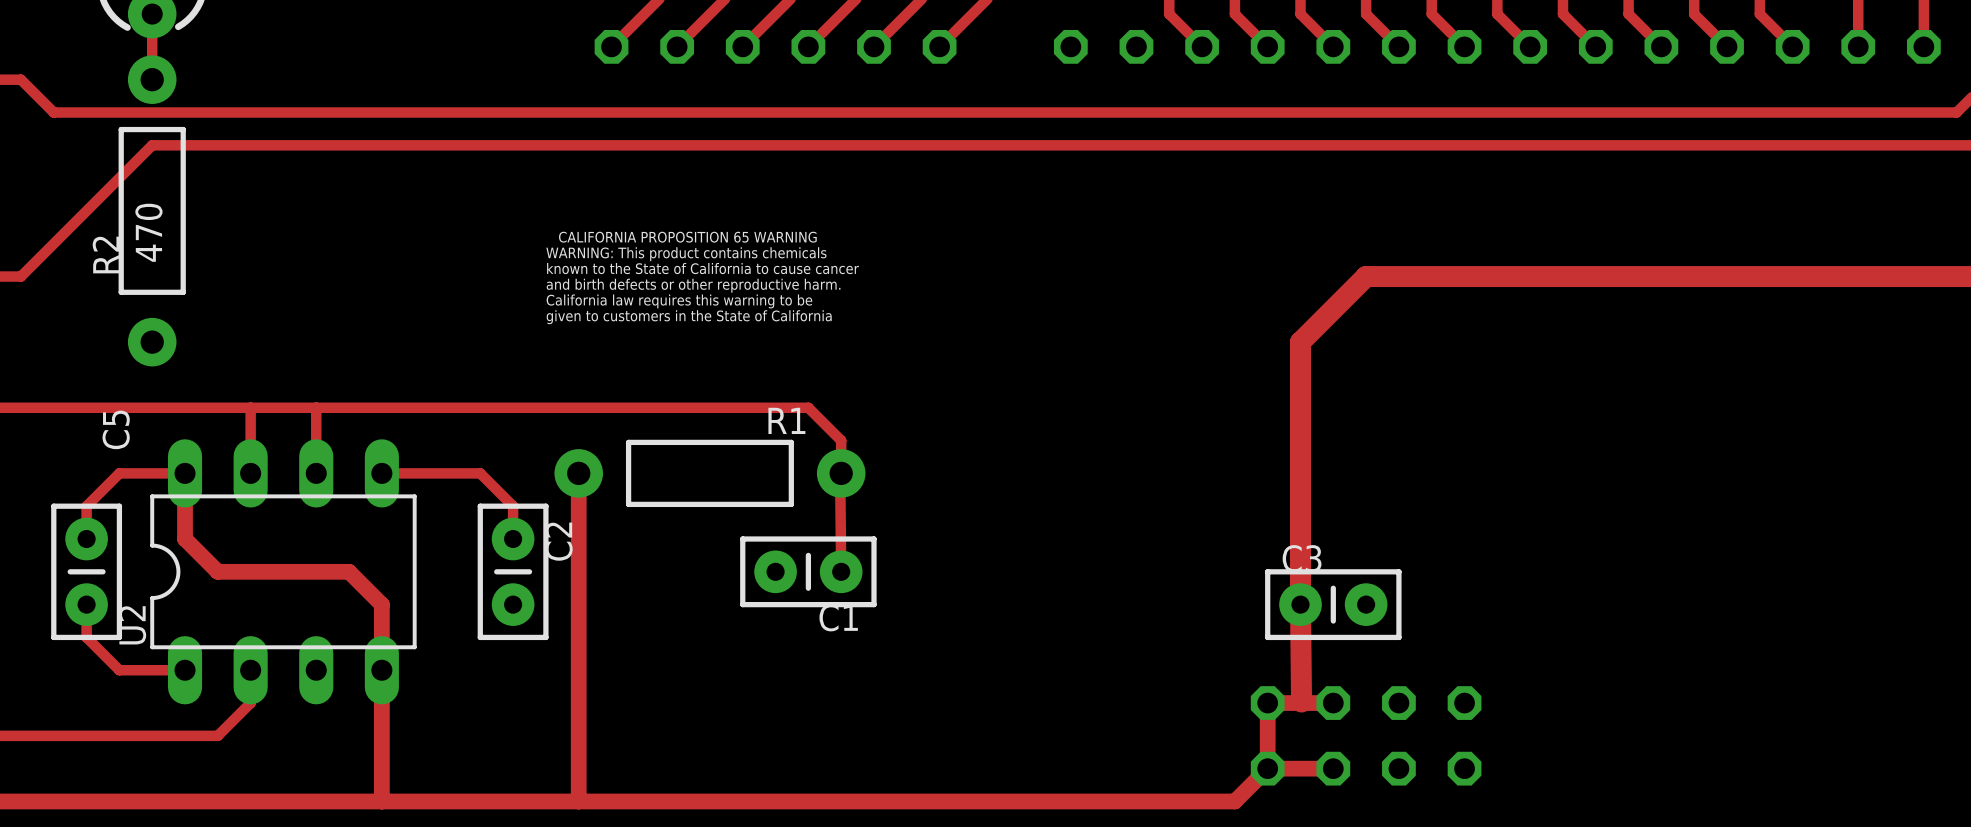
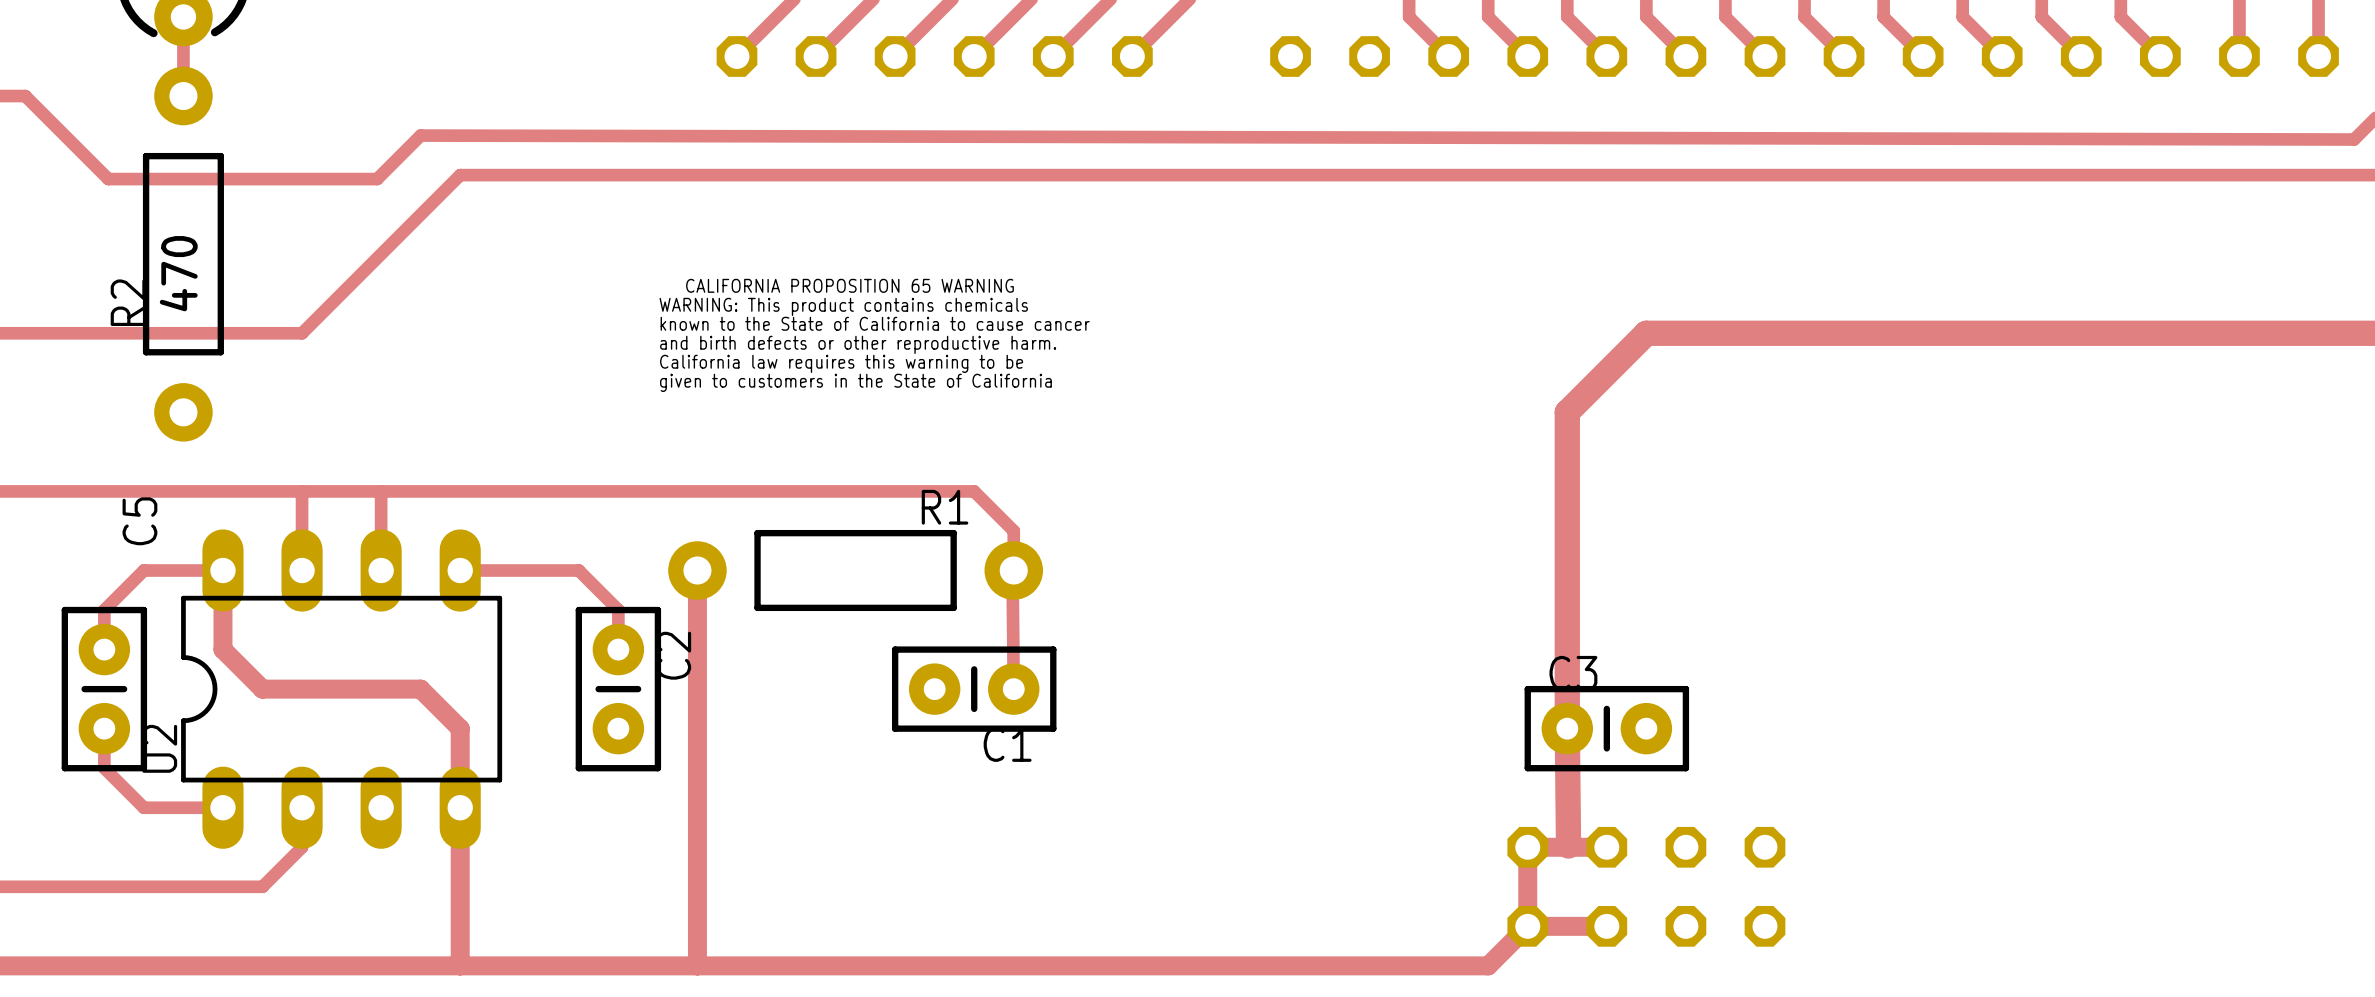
track: (53, 112) (1956, 112) -> (64, 135) (108, 179) (377, 179) (420, 135) (2354, 139) (2358, 135)
track: (381, 145) (152, 145) (20, 276) -> (460, 175) (302, 333) (25, 333)

